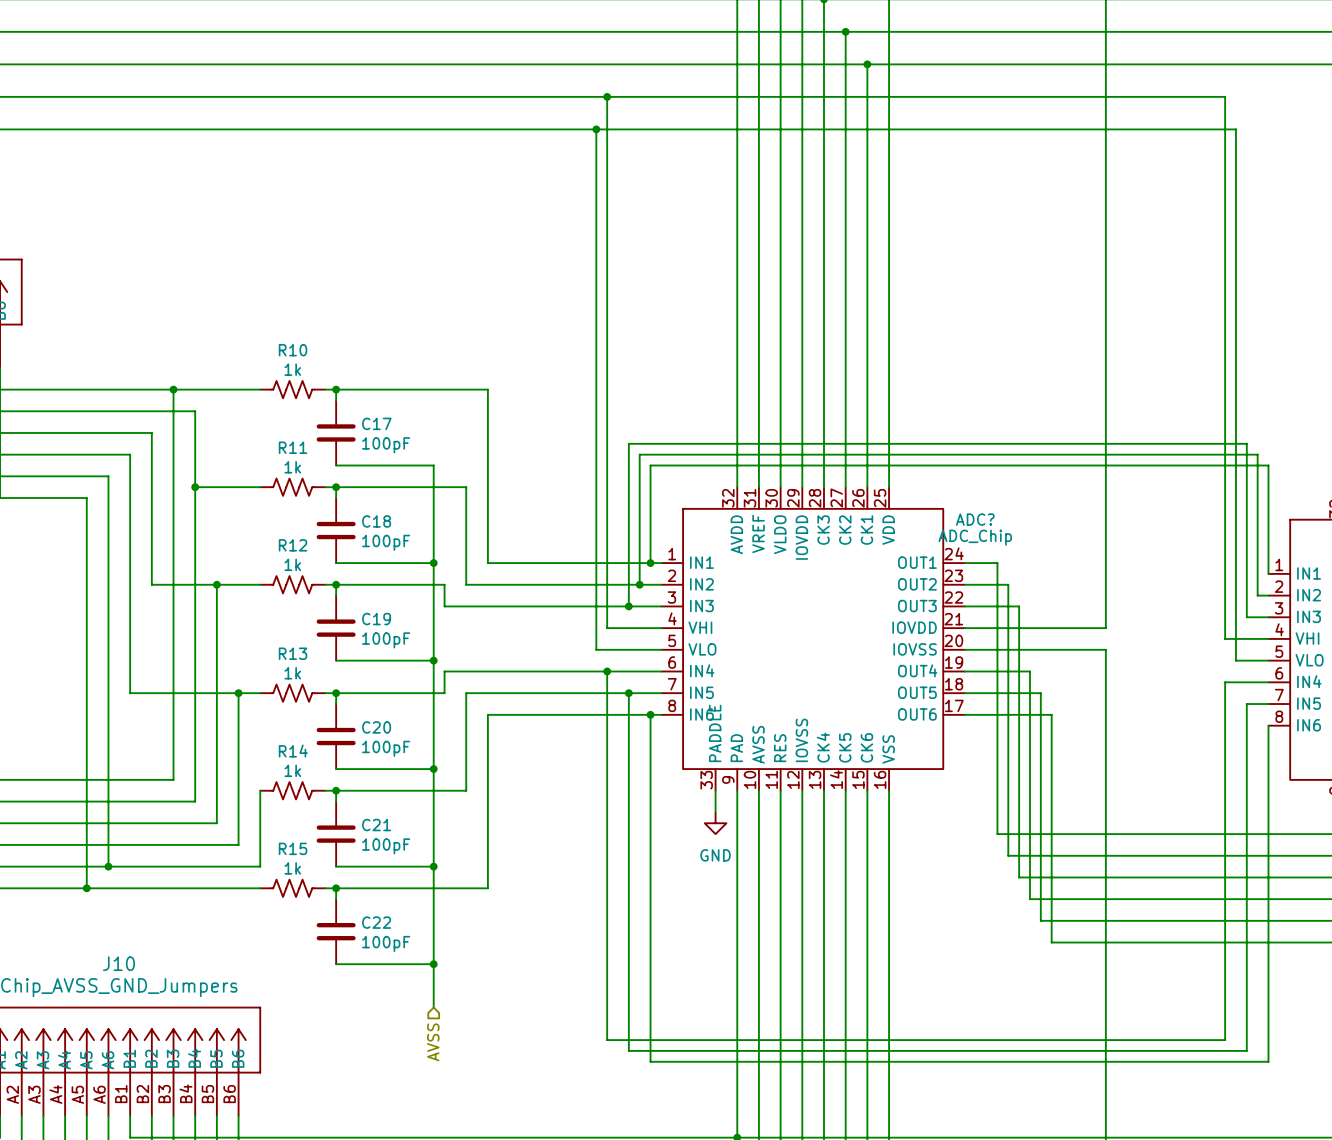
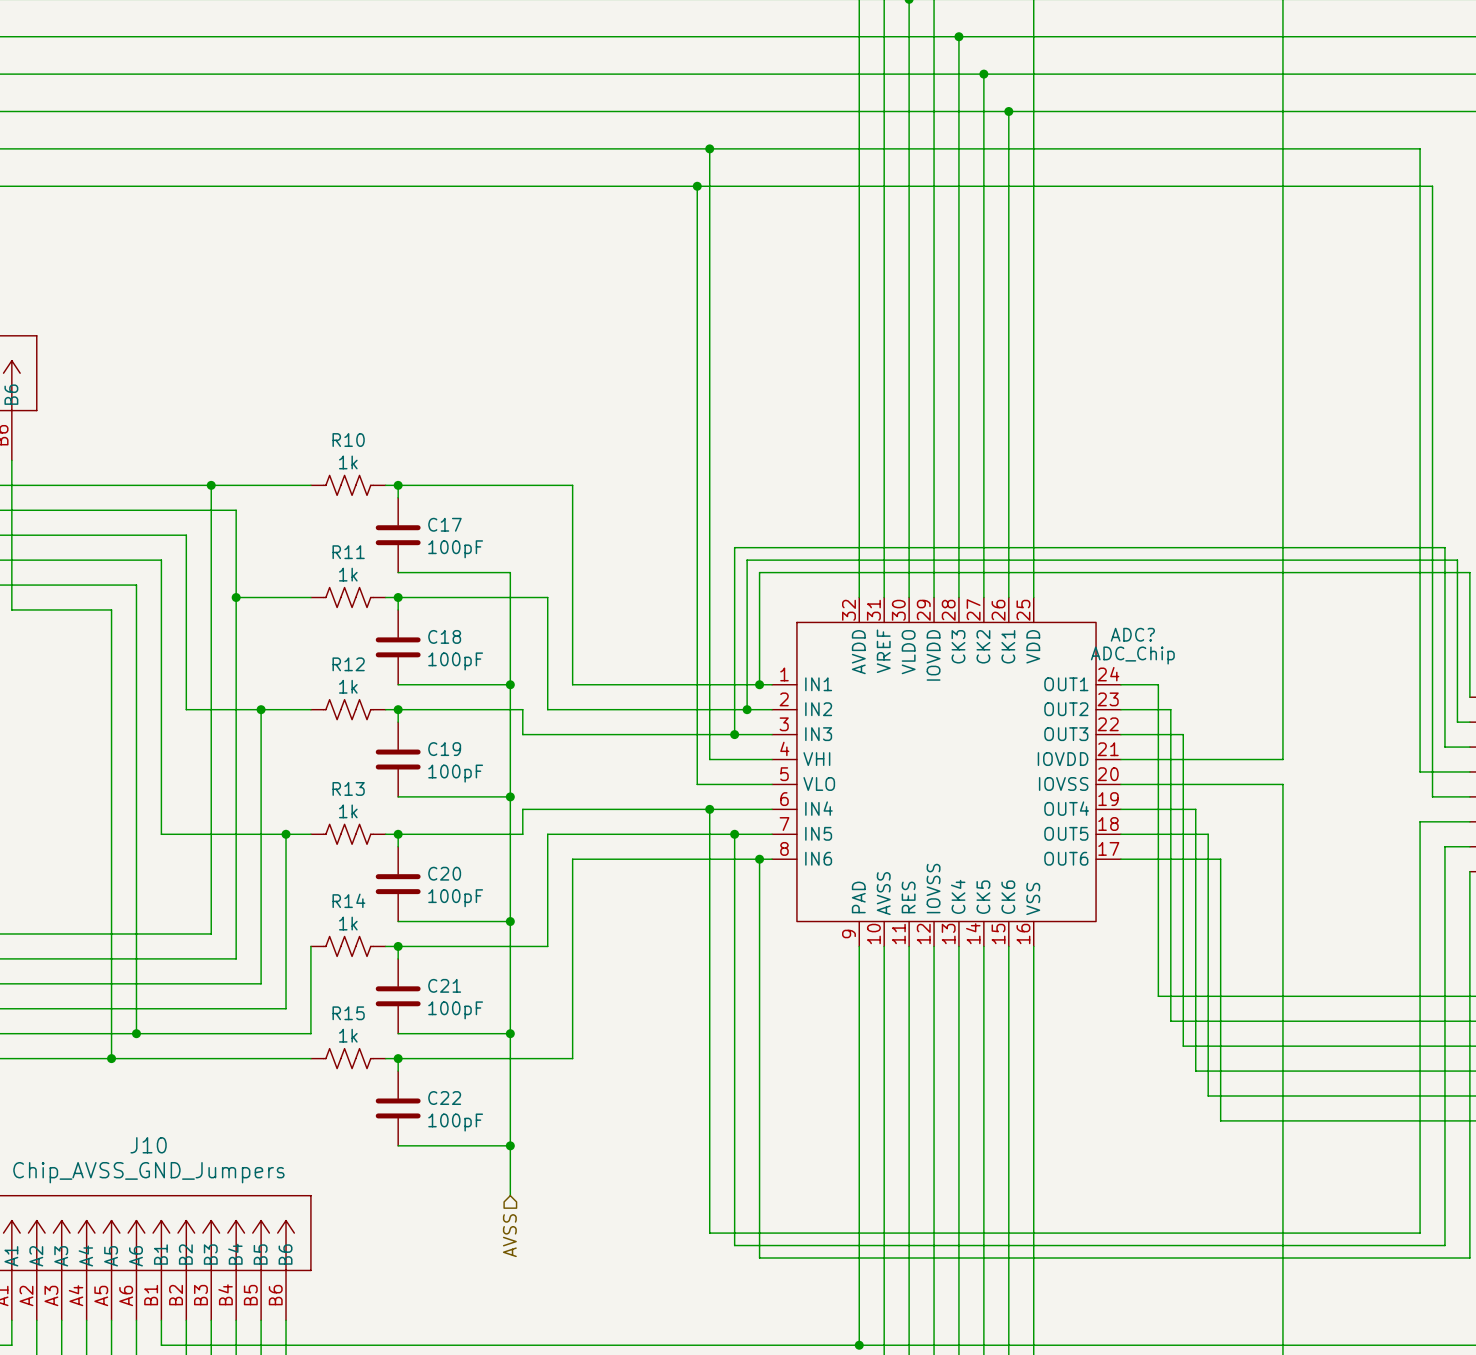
ADC? symbol: [661, 487, 965, 791] -> [772, 597, 1121, 947]
wire: (715, 790) (715, 812) -> none
power symbol: GND (715, 823) -> none

